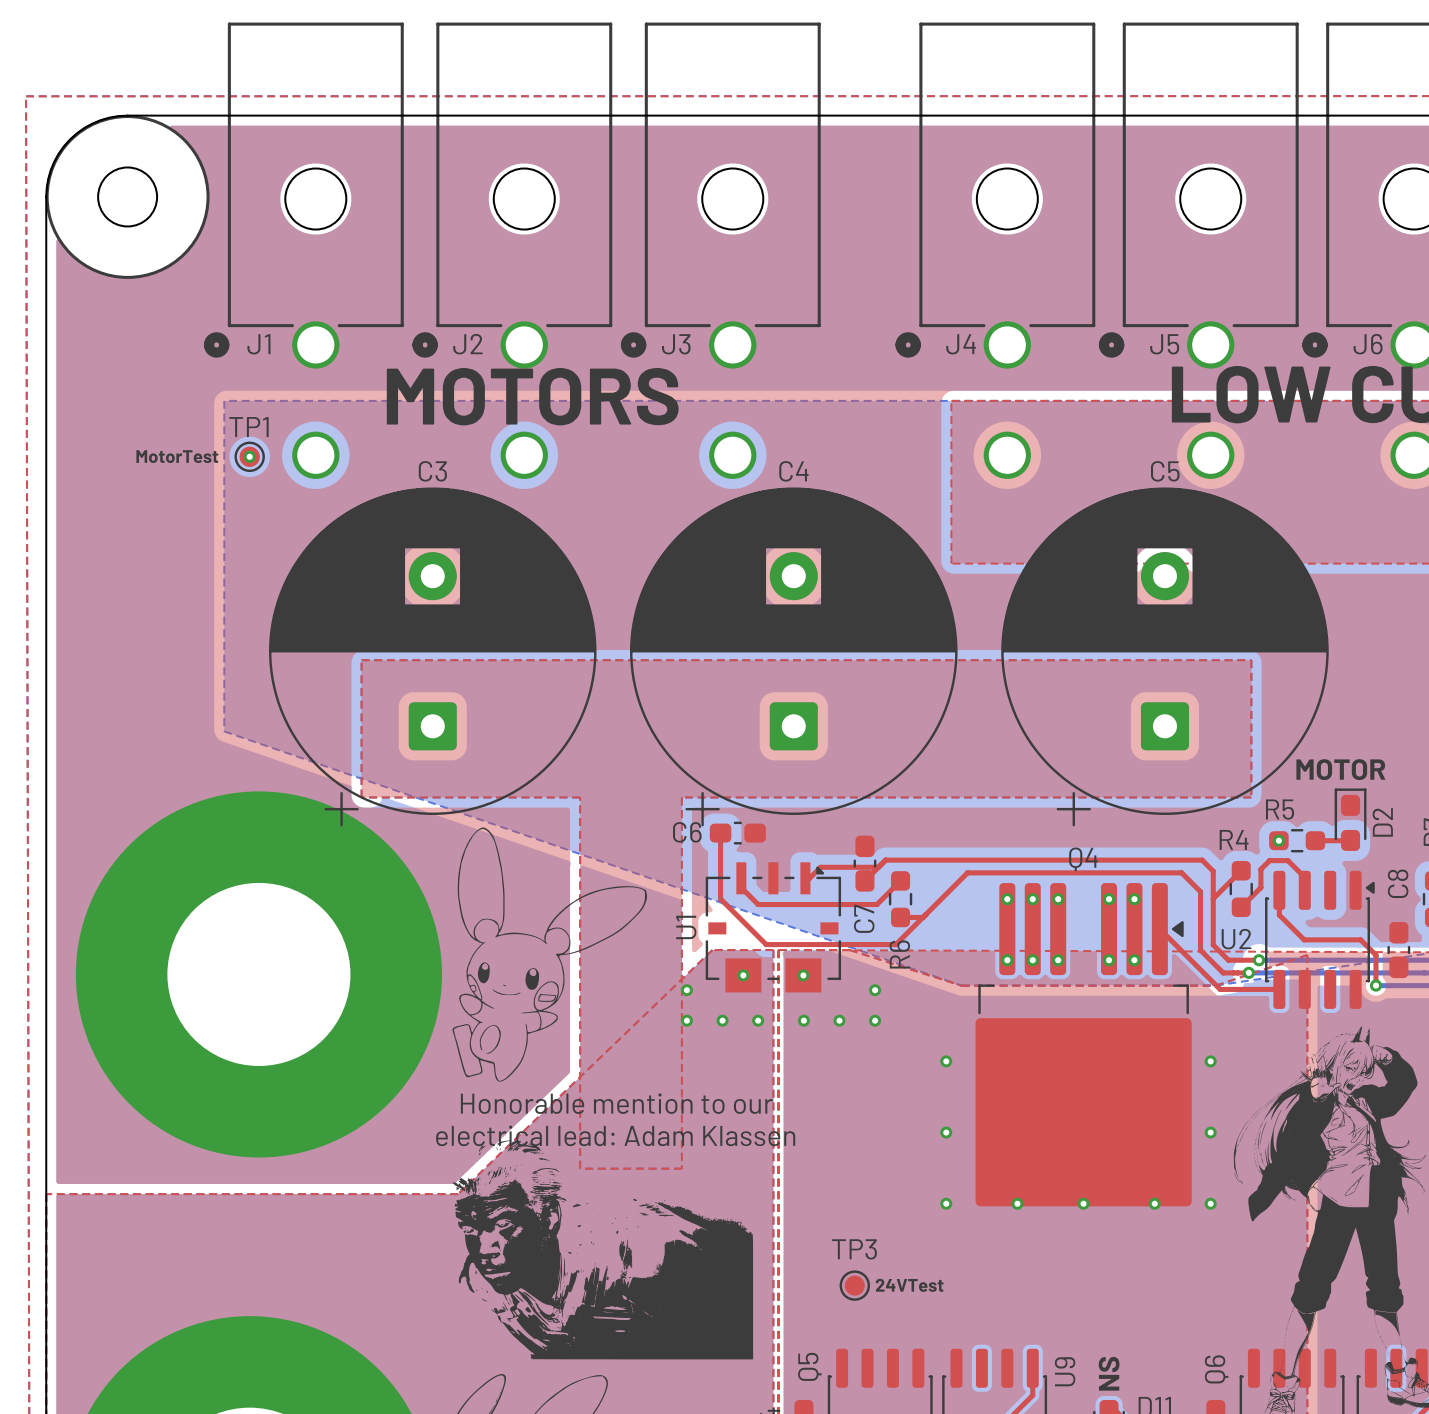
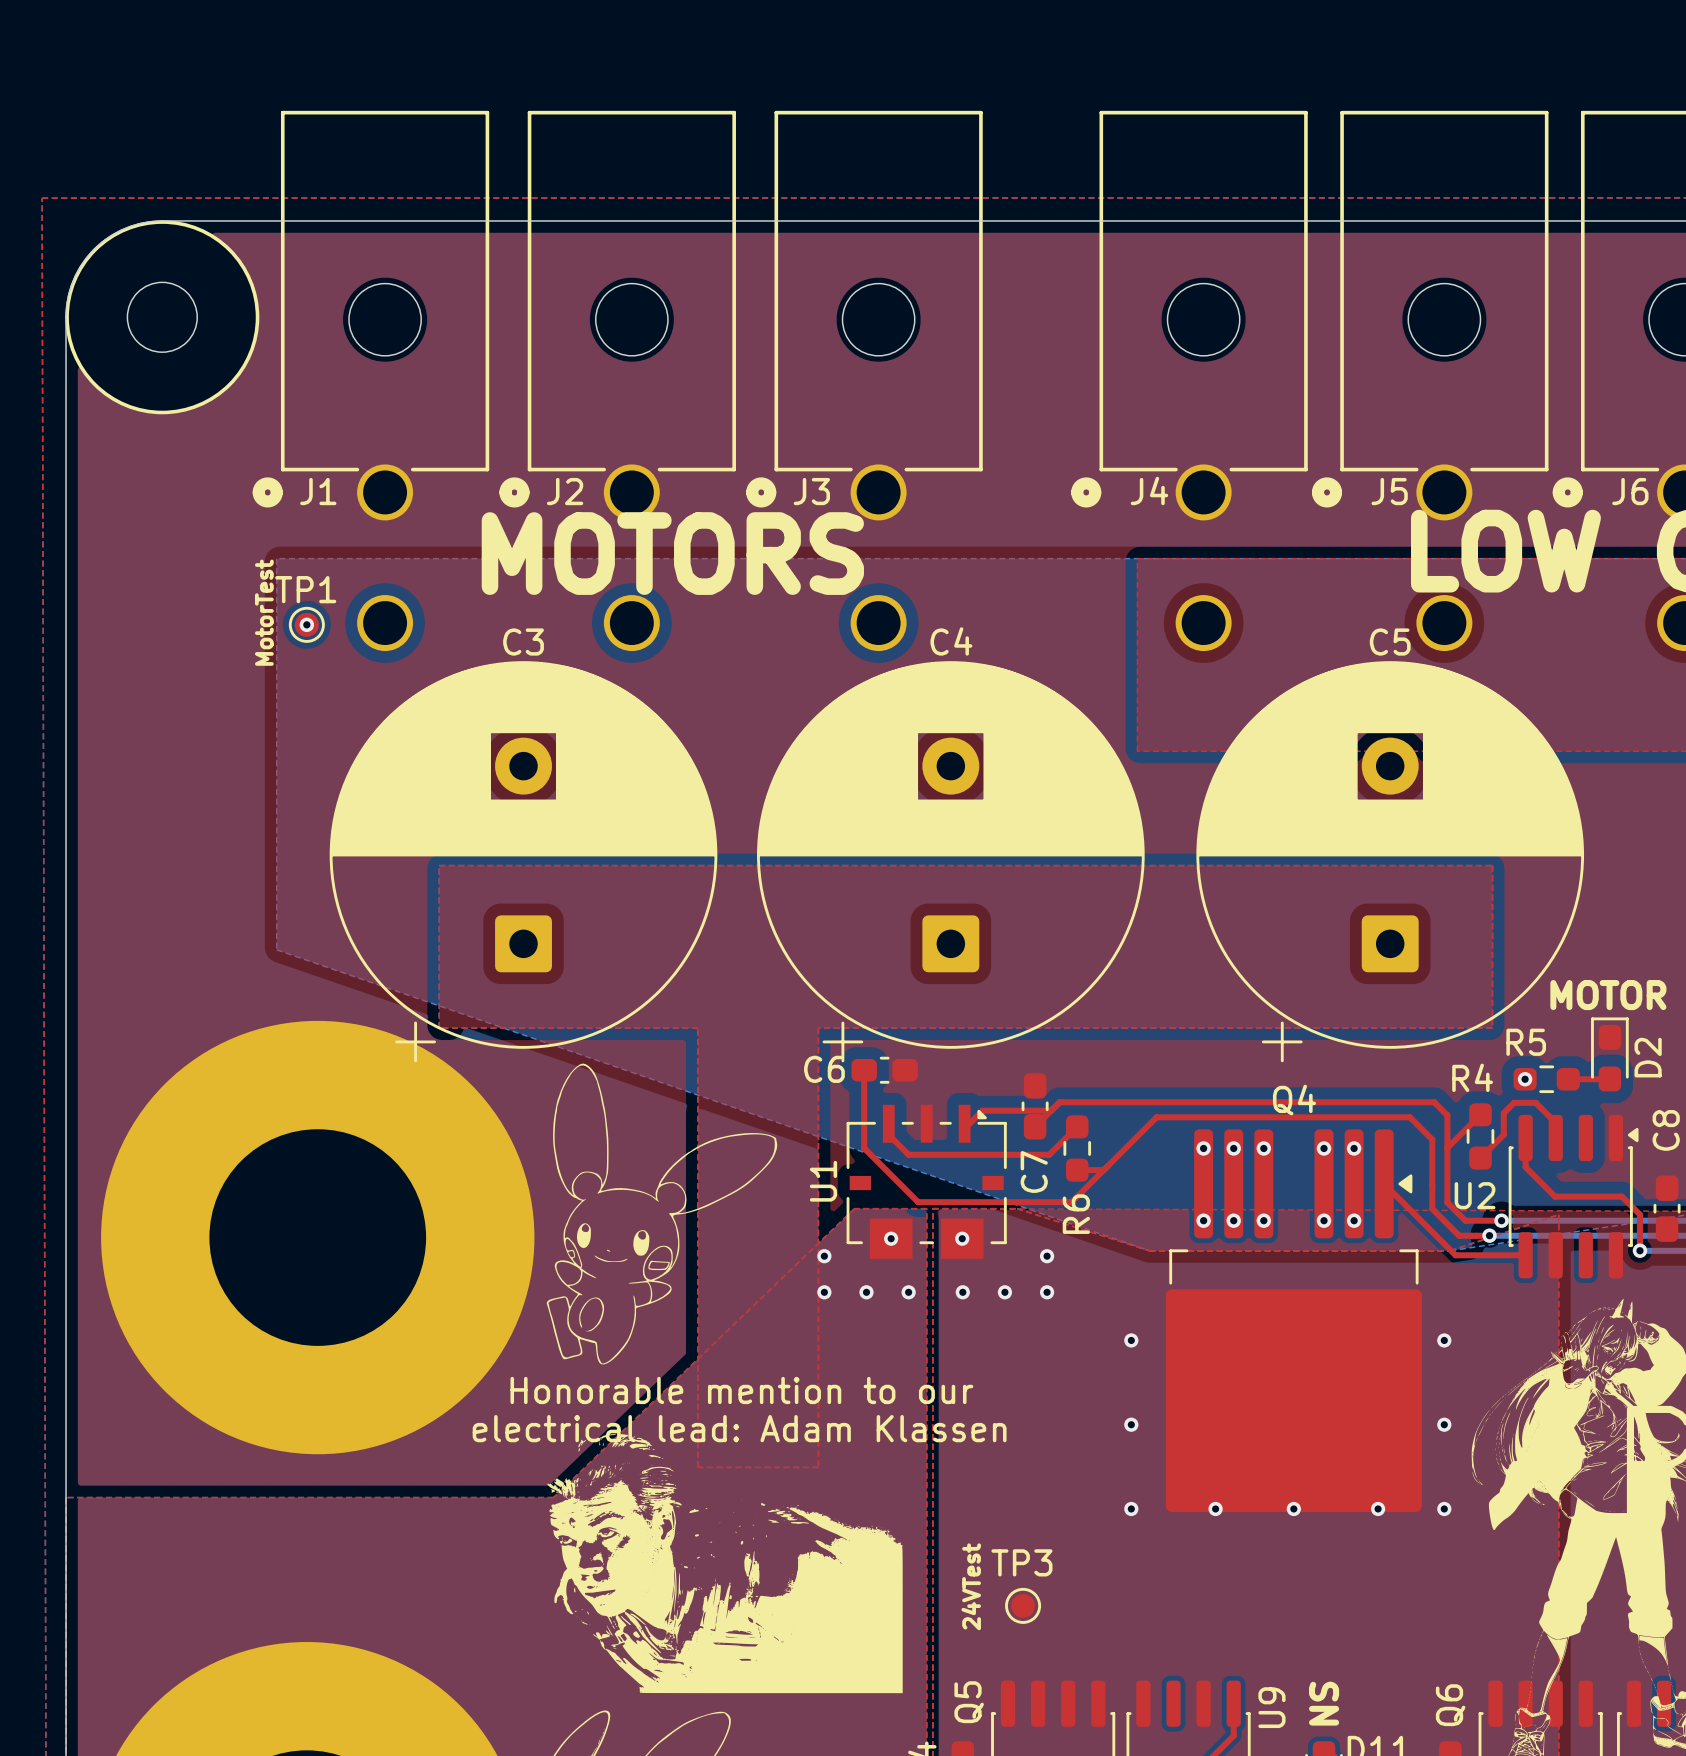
text rotation: 0° (177, 456) -> 90° counterclockwise (264, 612)
text rotation: 0° (909, 1285) -> 90° counterclockwise (971, 1586)
text position: 24VTest (909, 1285) -> 24VTest (971, 1586)

